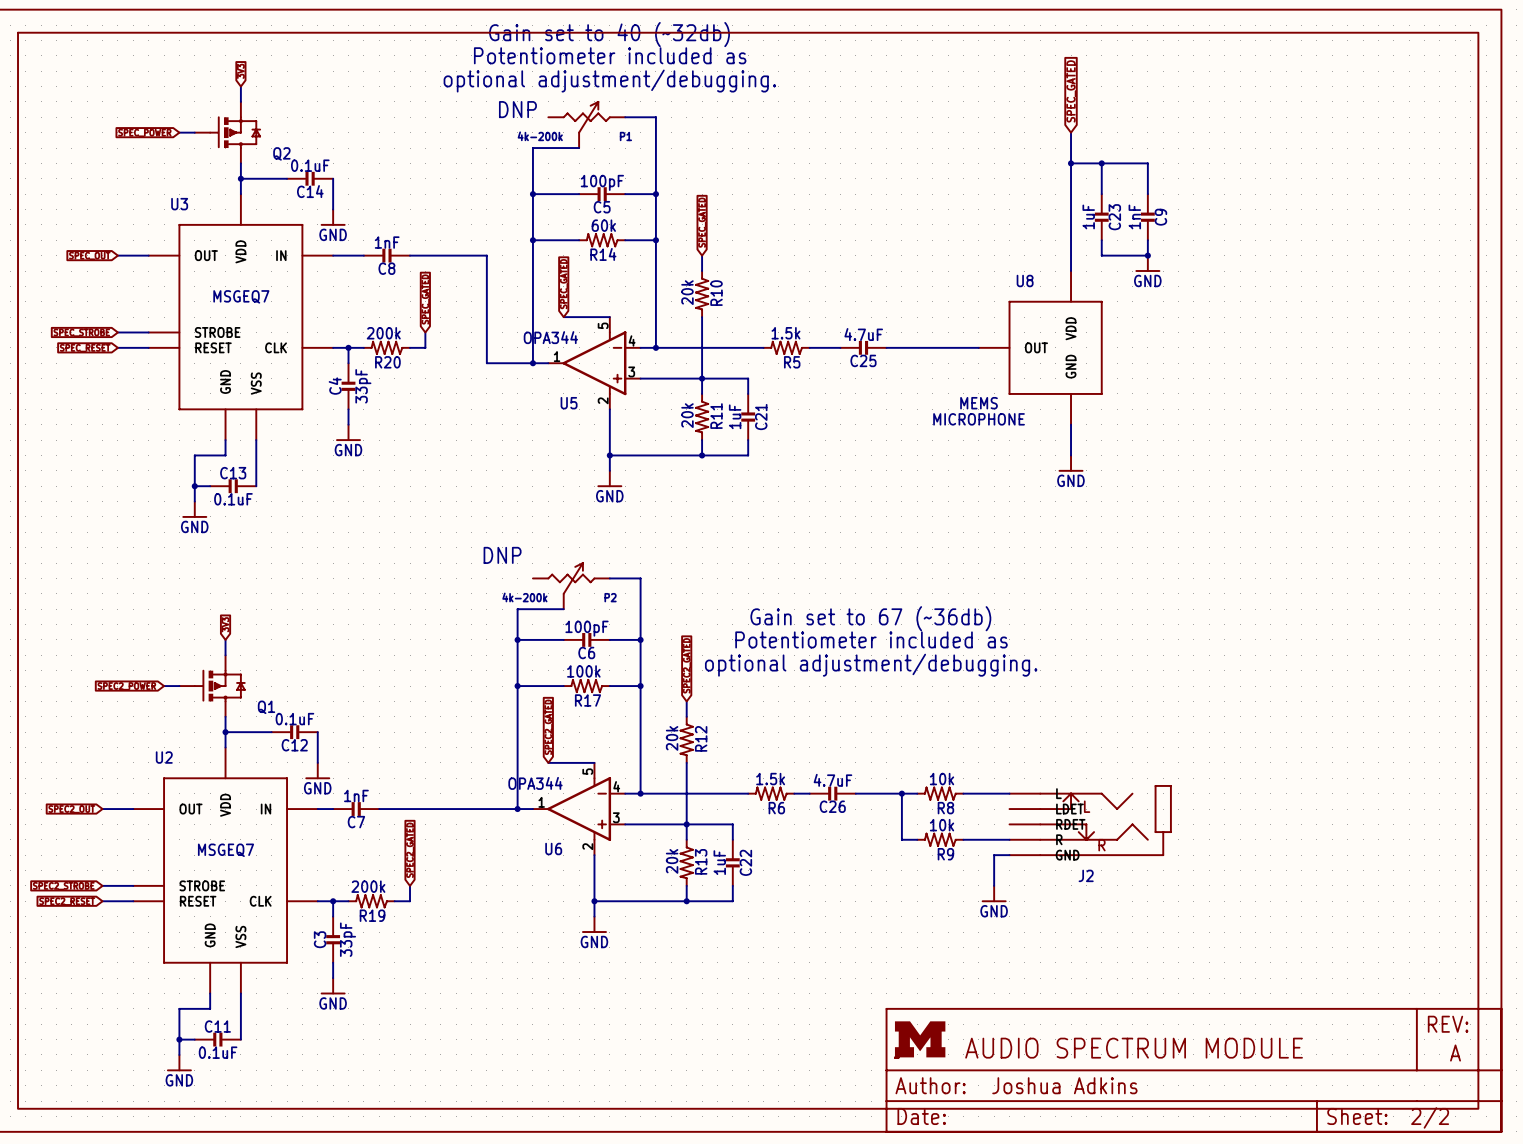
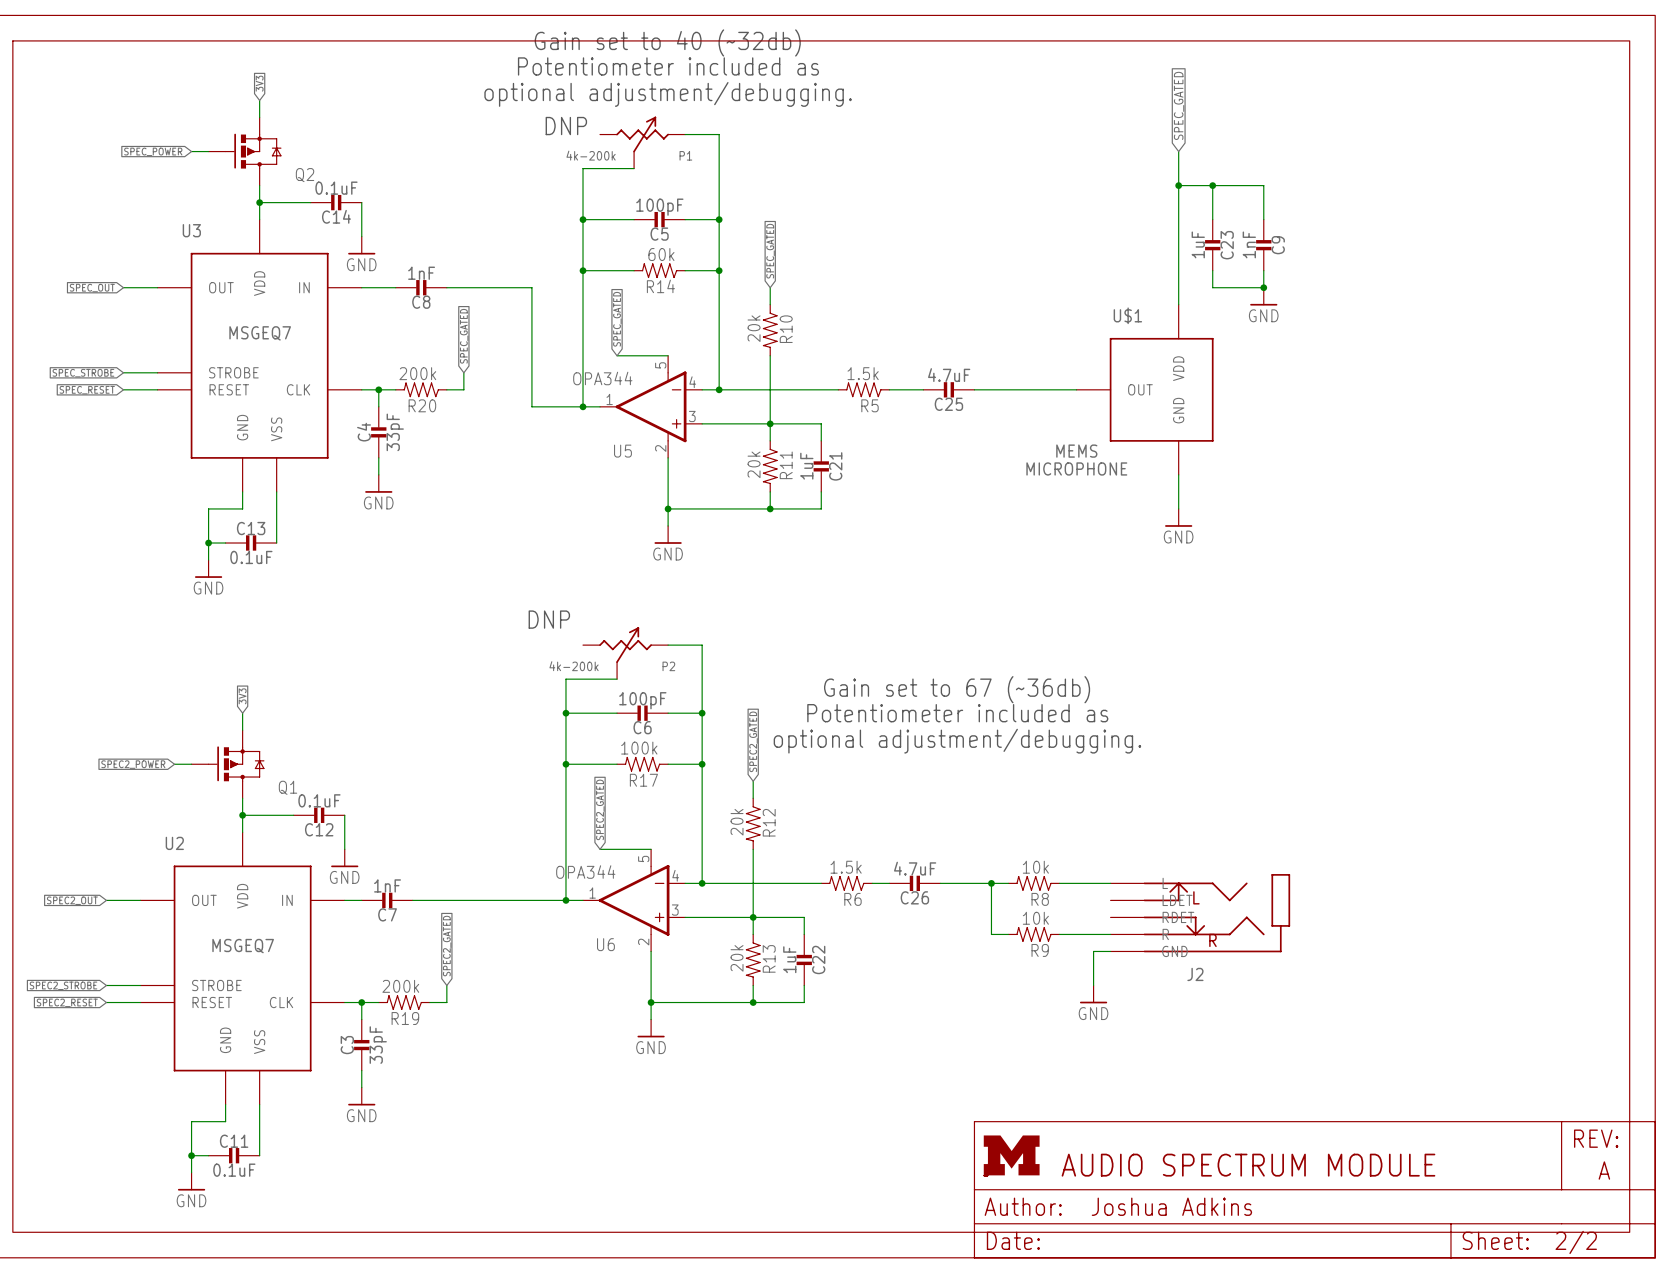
U8 name: U8 (1025, 280) -> U$1 (1127, 315)

